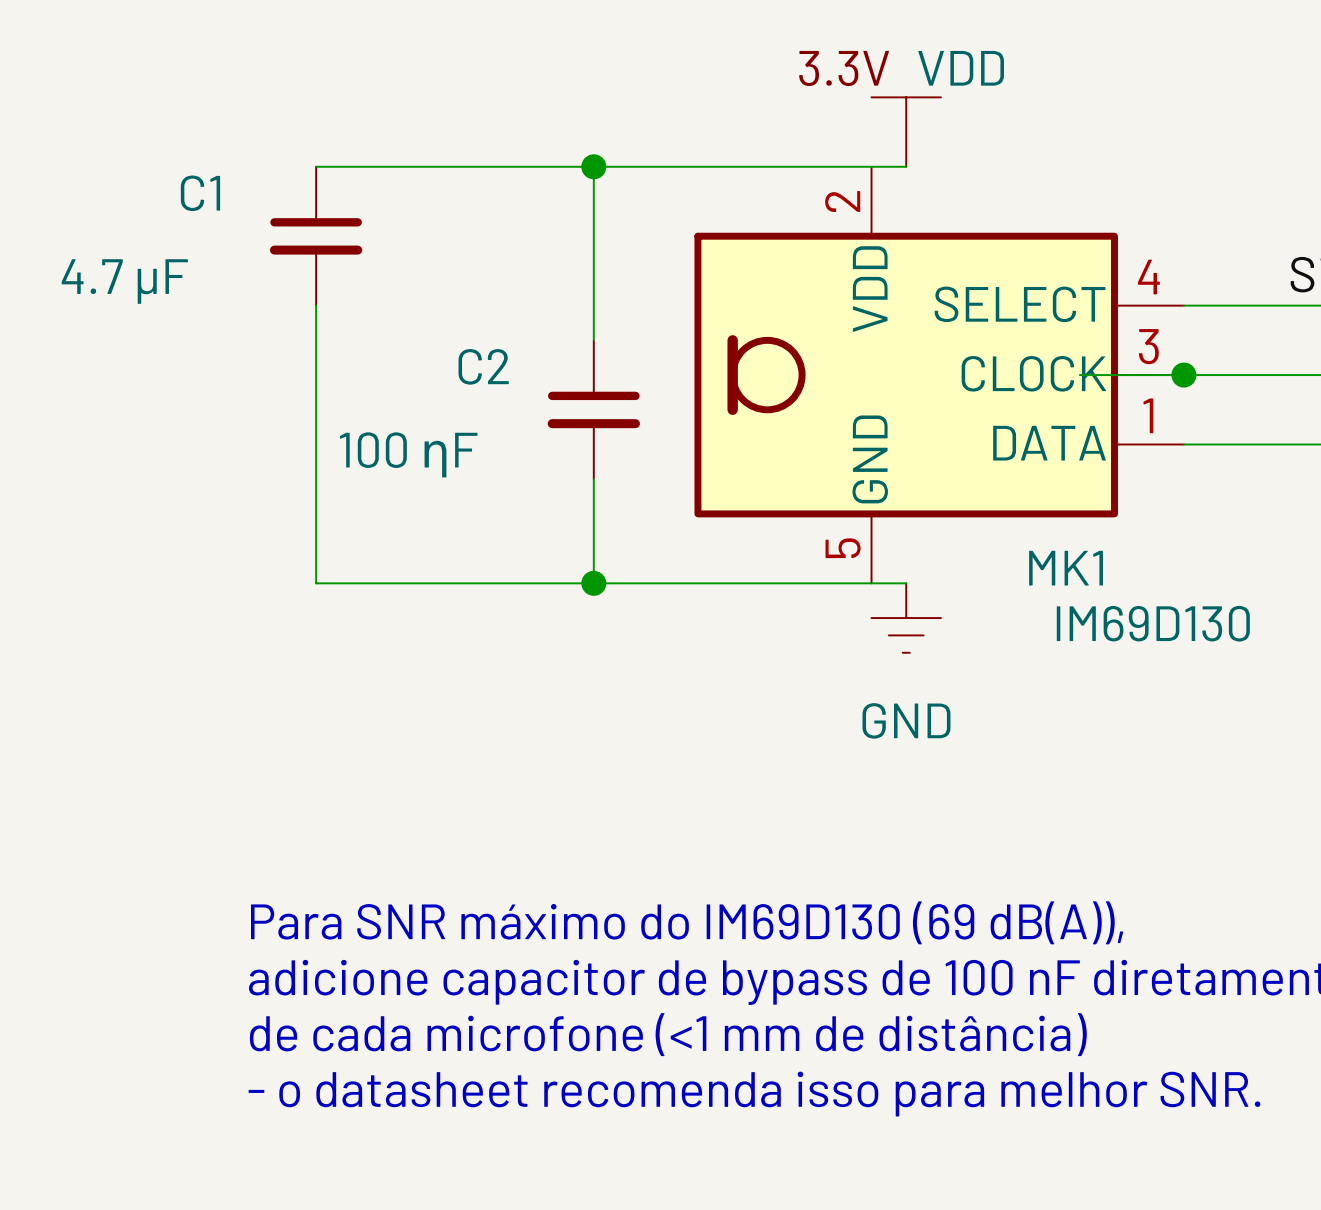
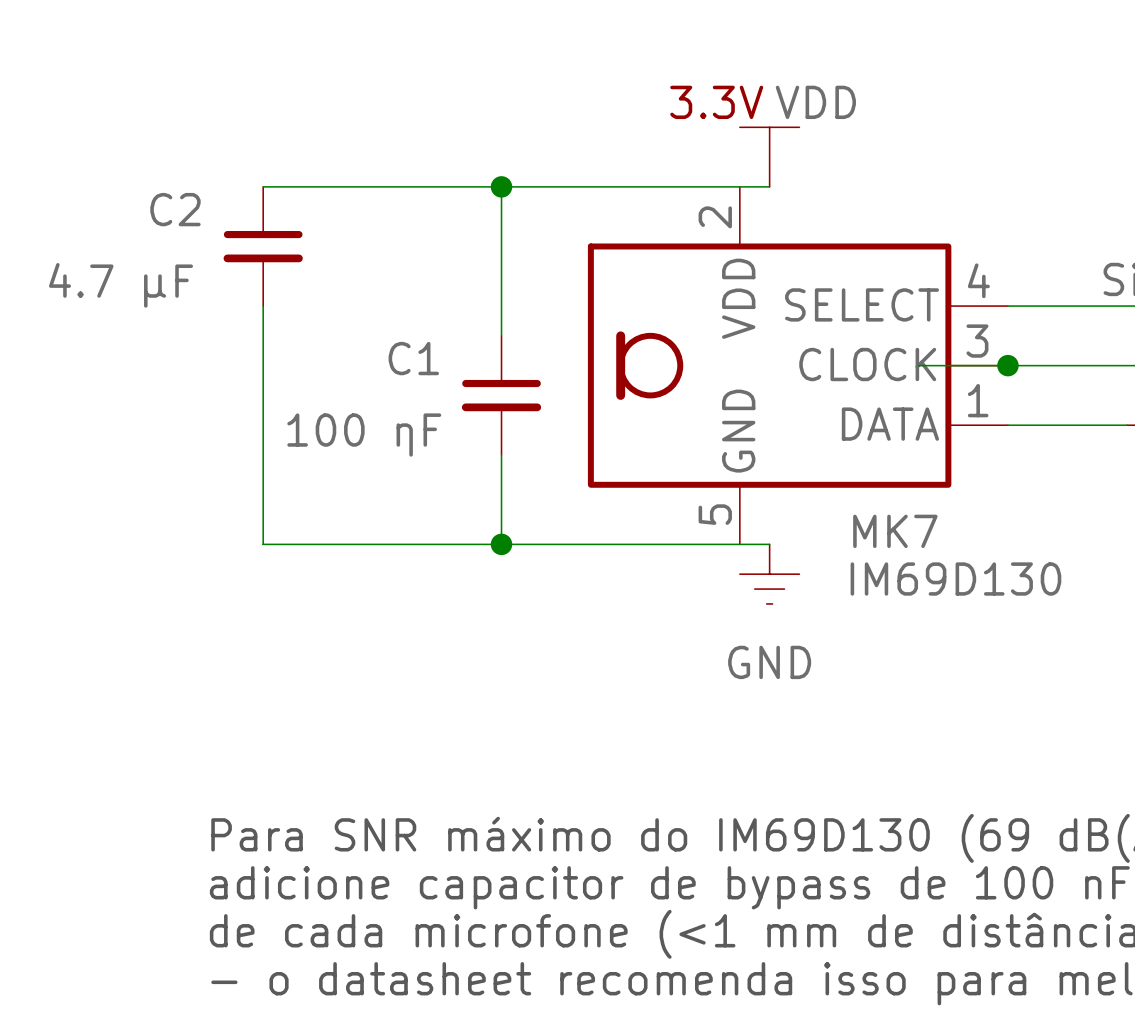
C1 name: C1 (200, 193) -> C2 (175, 209)
C2 name: C2 (483, 366) -> C1 (413, 358)
MK1 name: MK1 (1066, 568) -> MK7 (895, 531)

